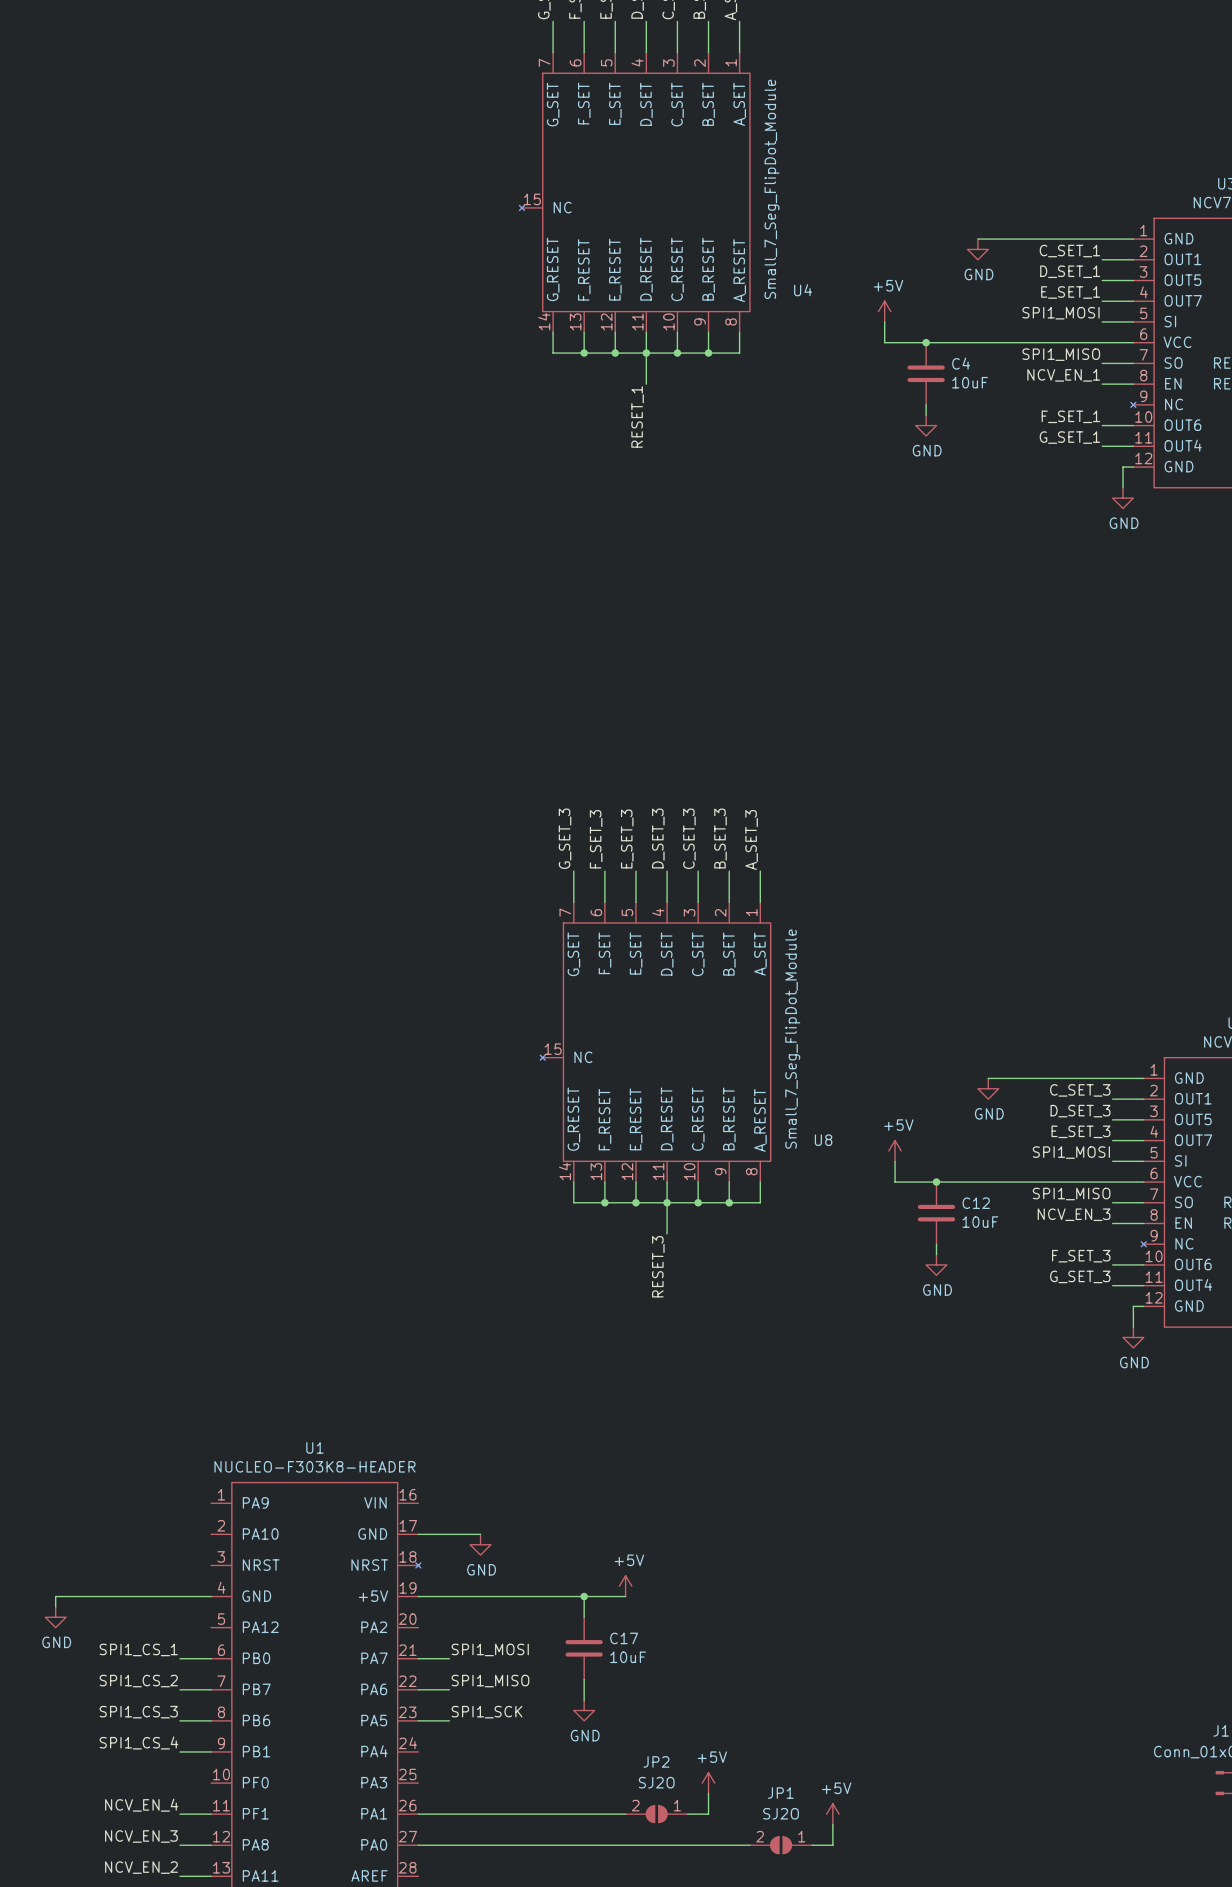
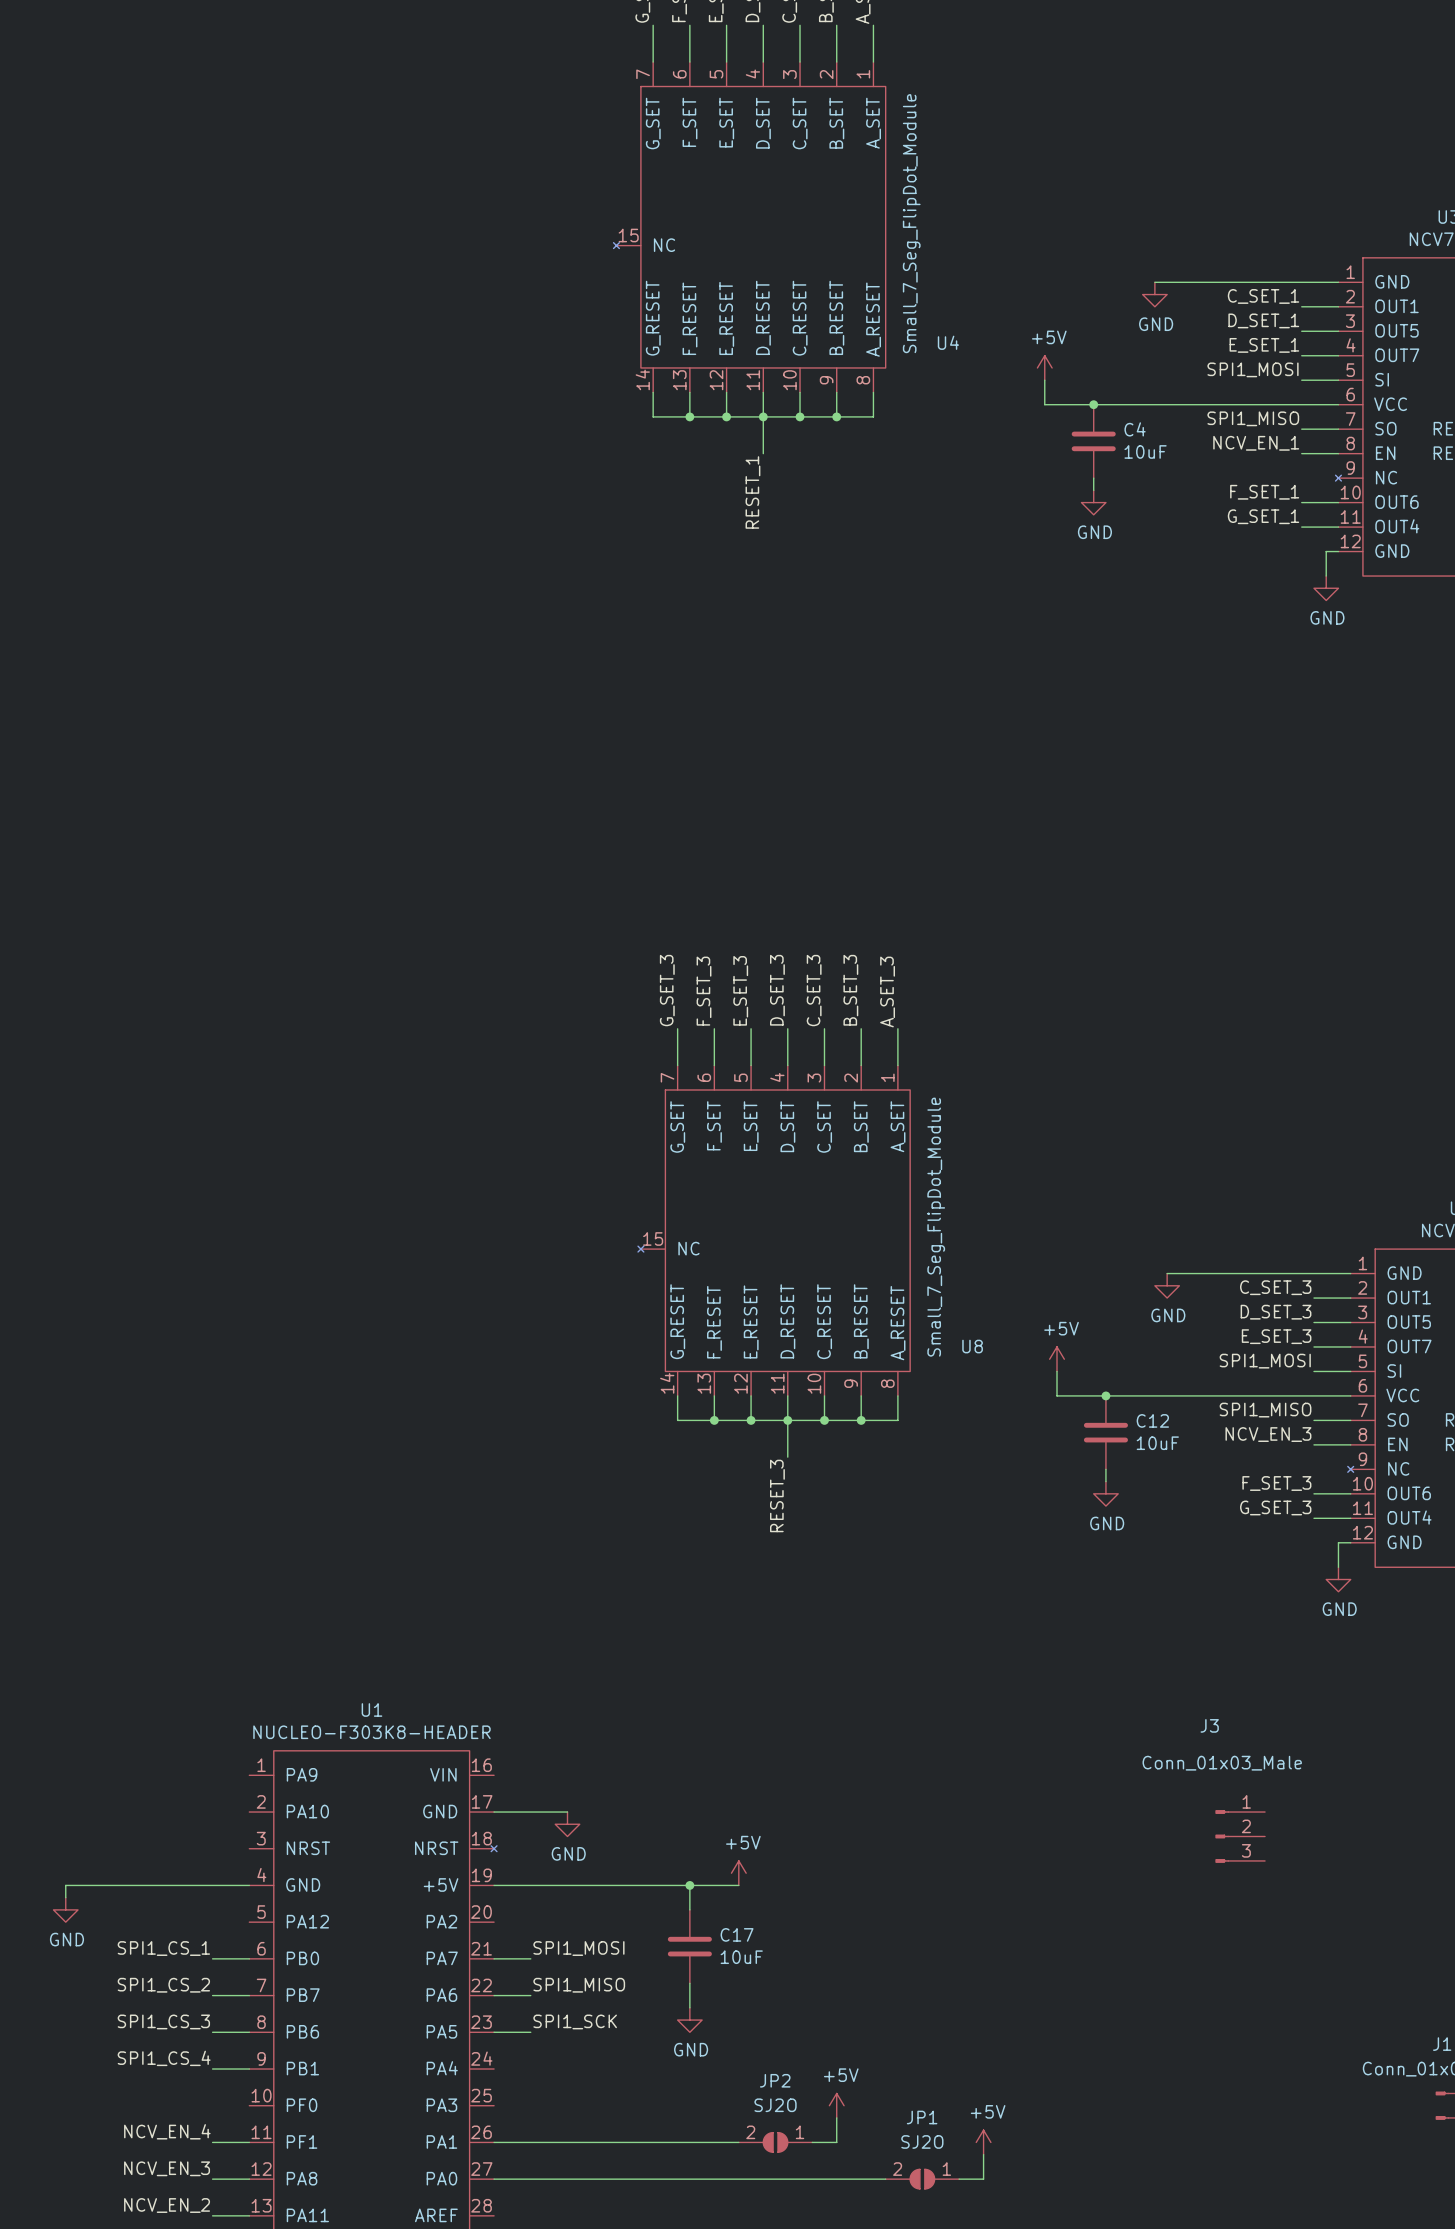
J3: none -> Conn_01x03_Male (1240, 1836)

